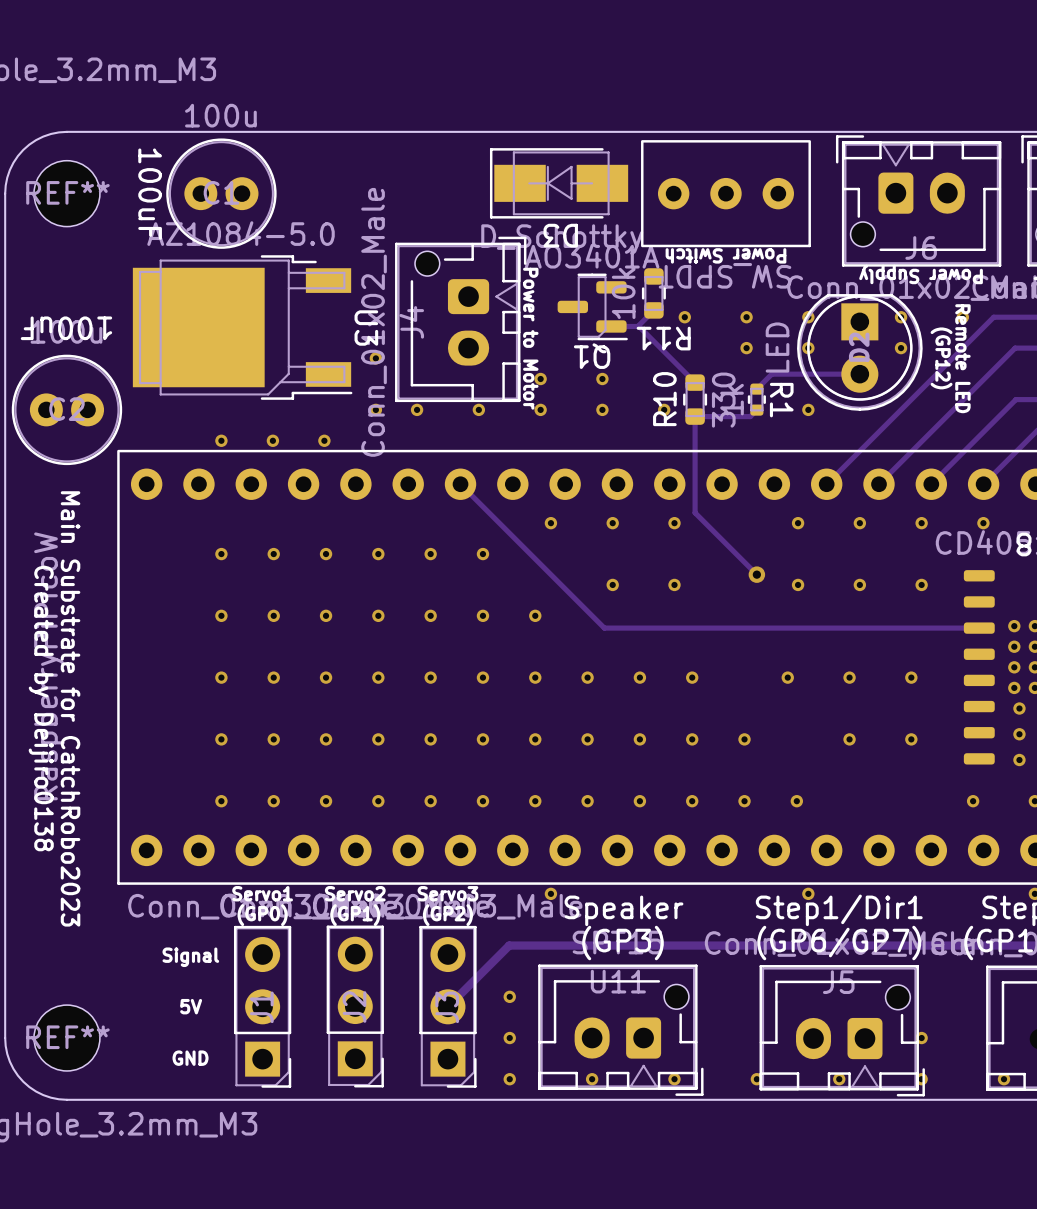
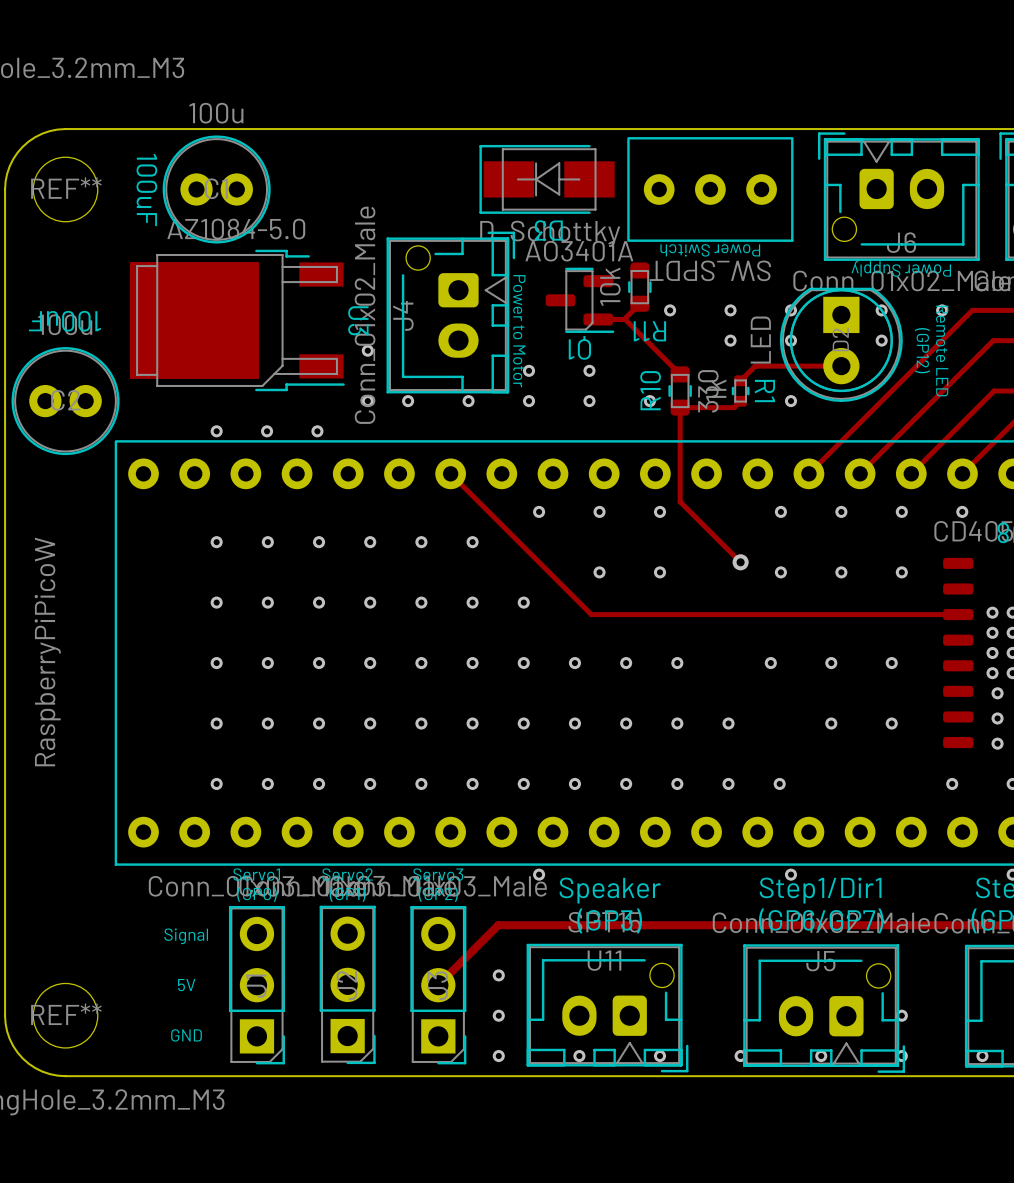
text: Created by Deijiro0138 (41, 708) -> none
text: Main Substrate for CatchRobo2023 (70, 708) -> none

